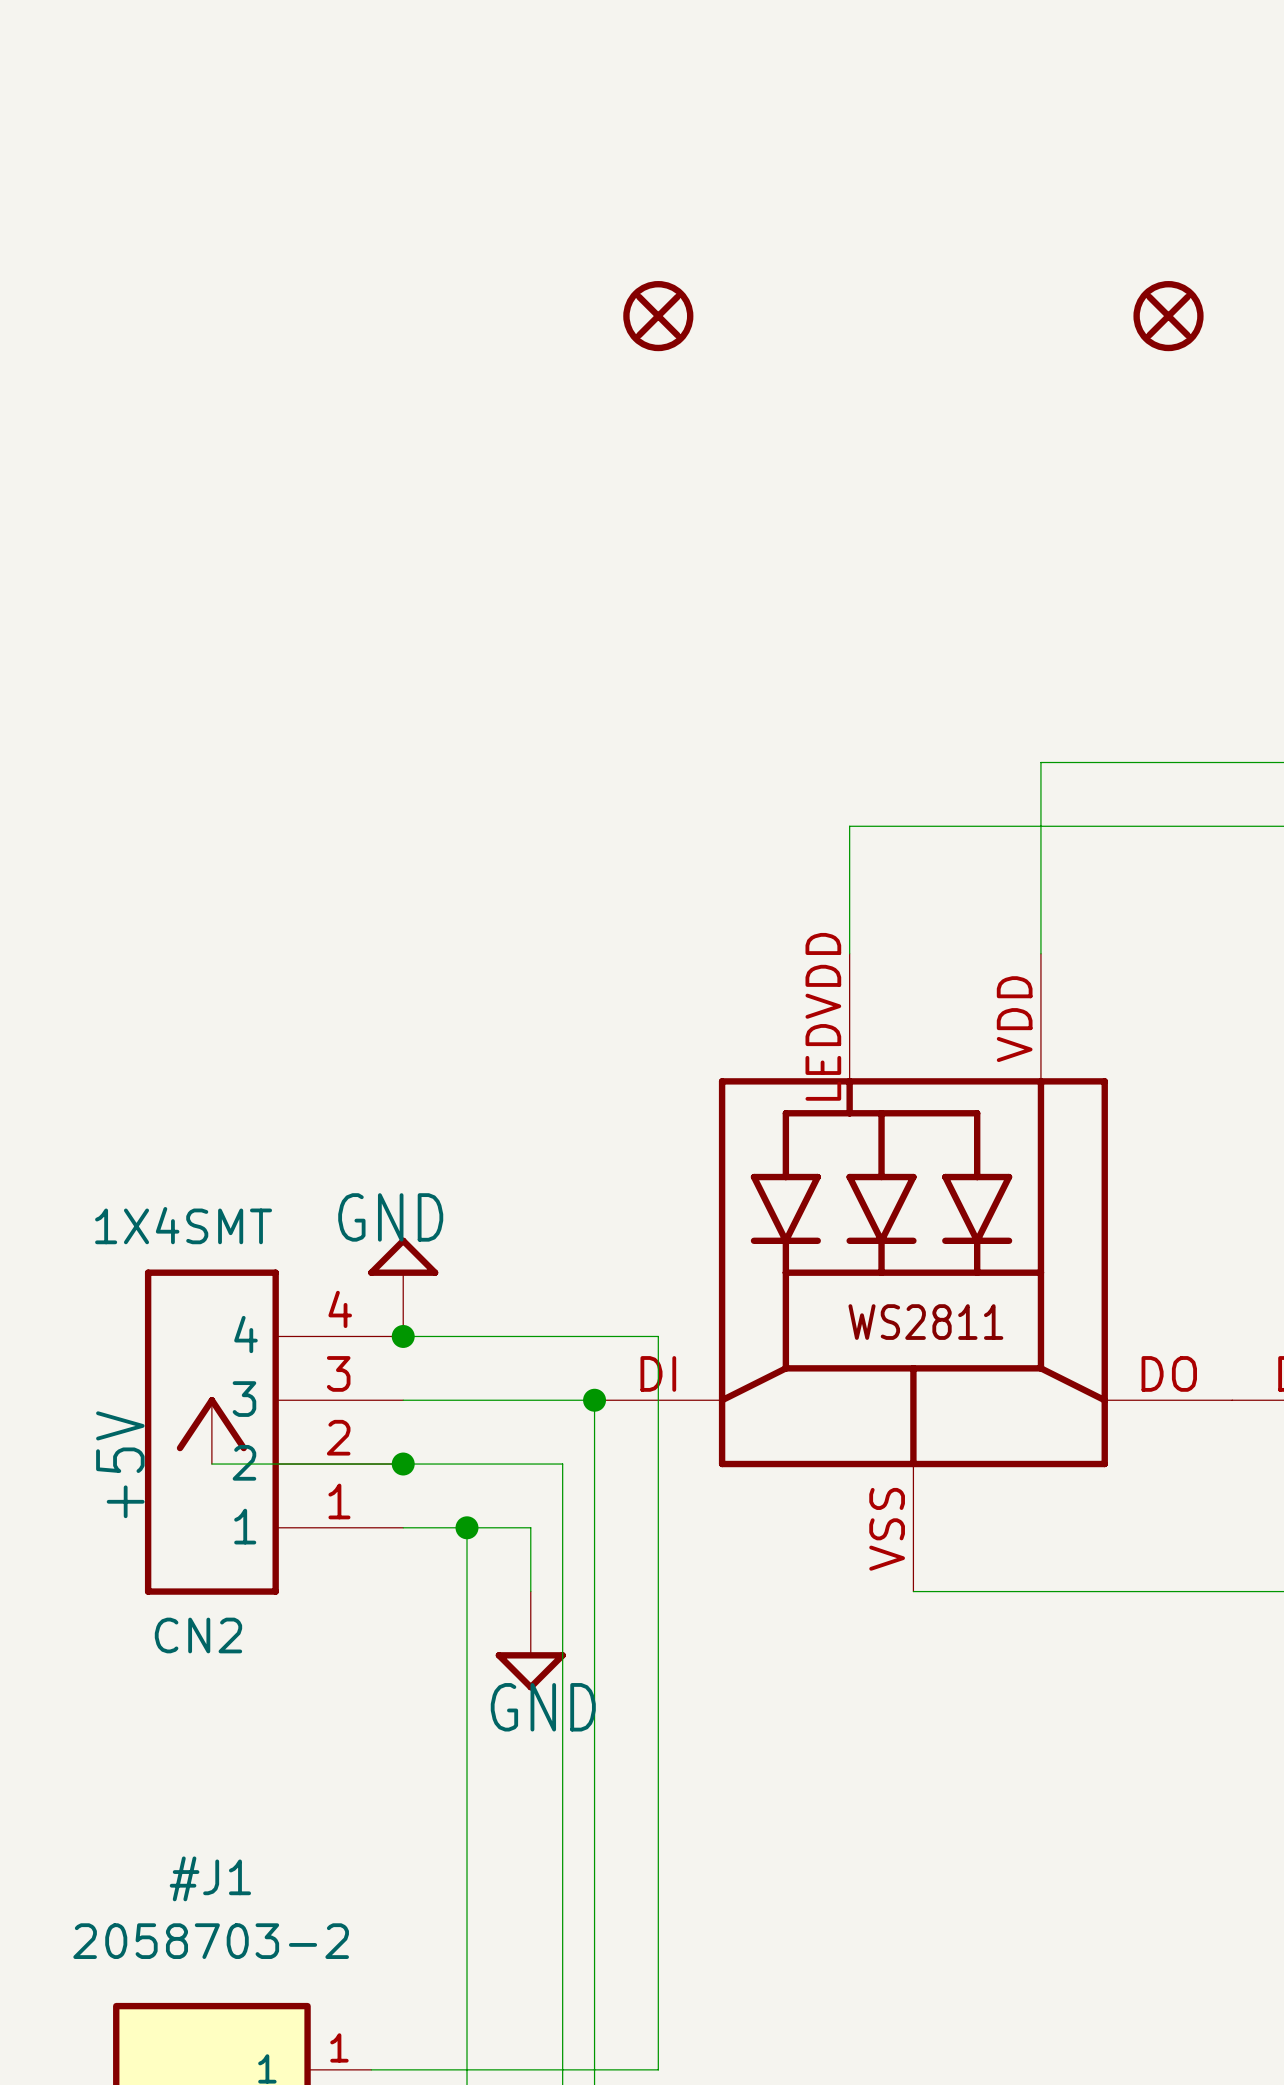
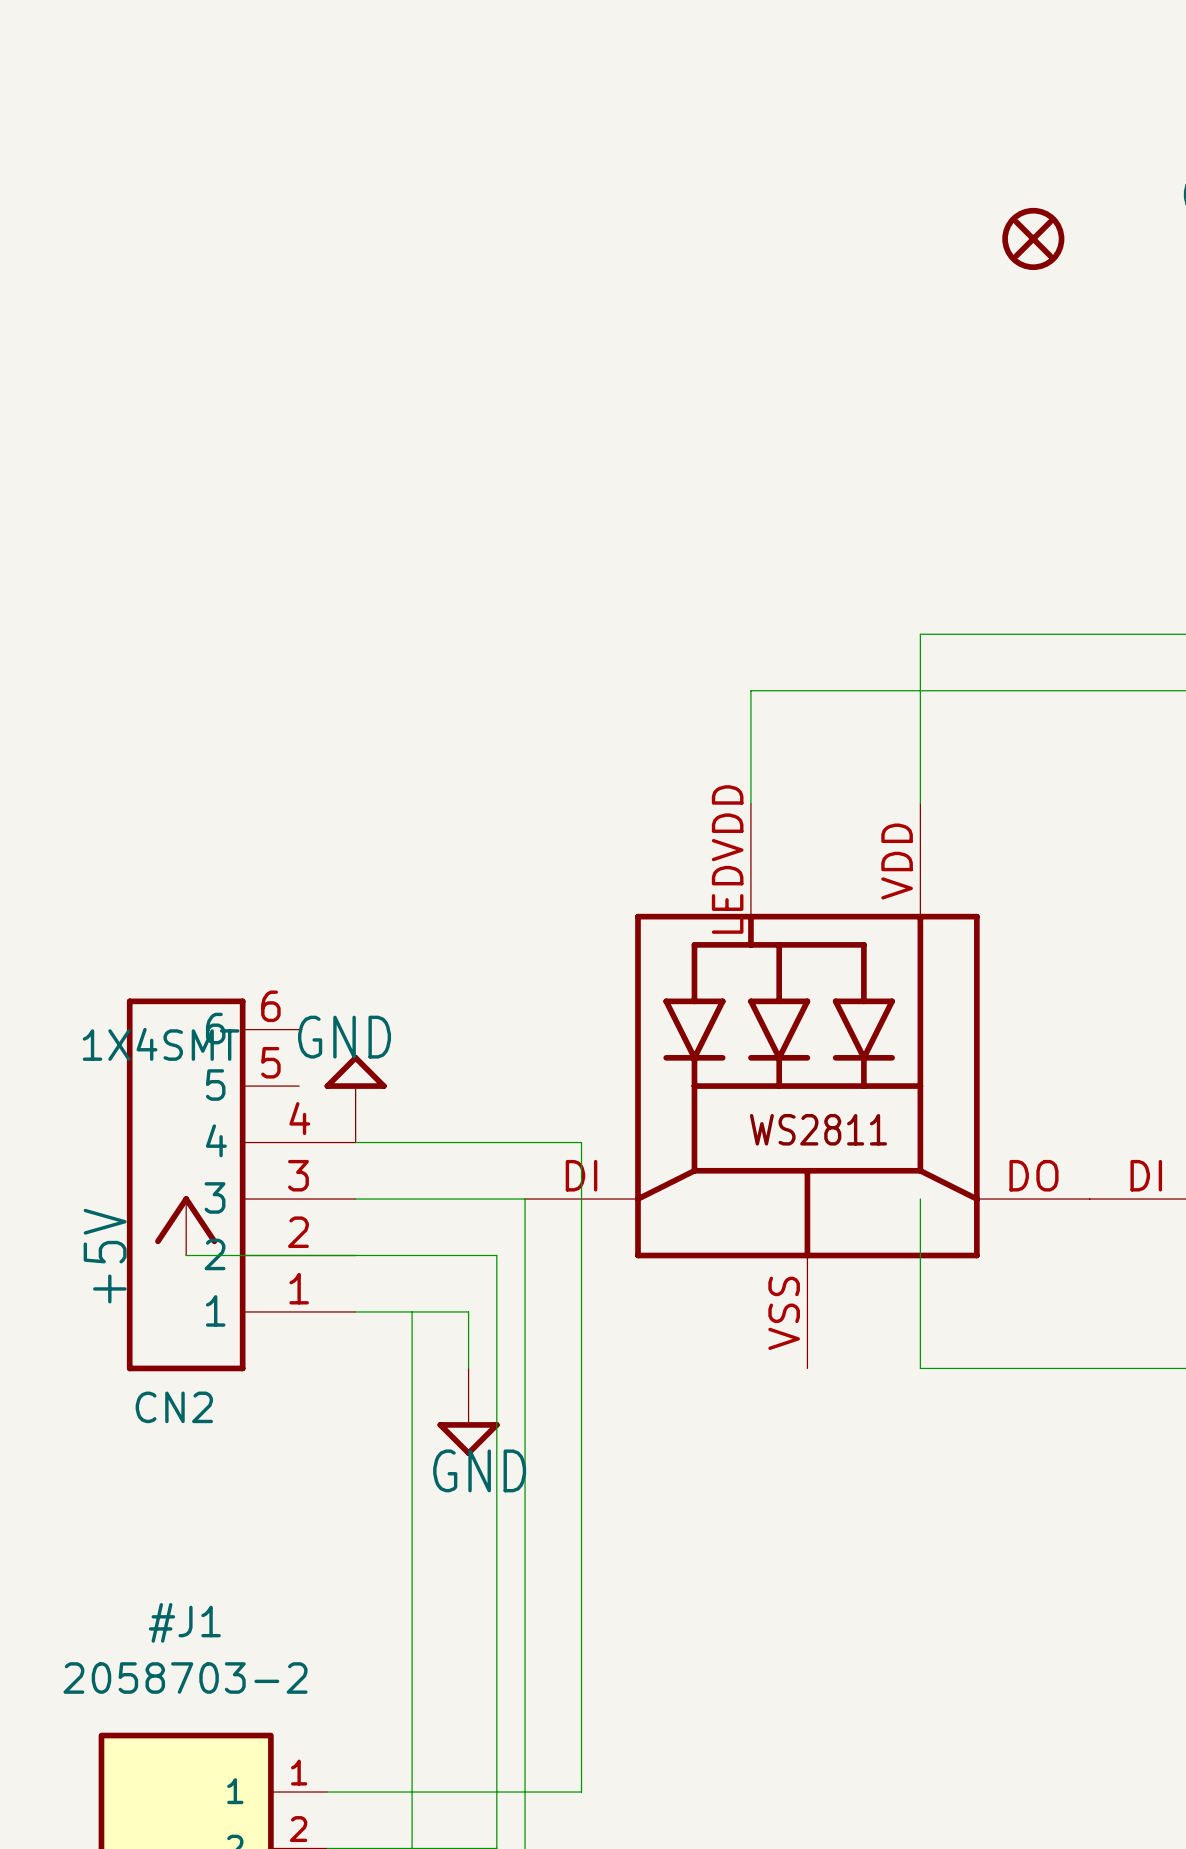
part: (658, 316) -> none
CN2 symbol: [144, 1269, 404, 1595] -> [126, 998, 356, 1372]
junction: (403, 1336) -> none
junction: (594, 1400) -> none
junction: (403, 1464) -> none
junction: (467, 1527) -> none
wire: (913, 1591) (1040, 1591) -> (920, 1199) (920, 1368)

